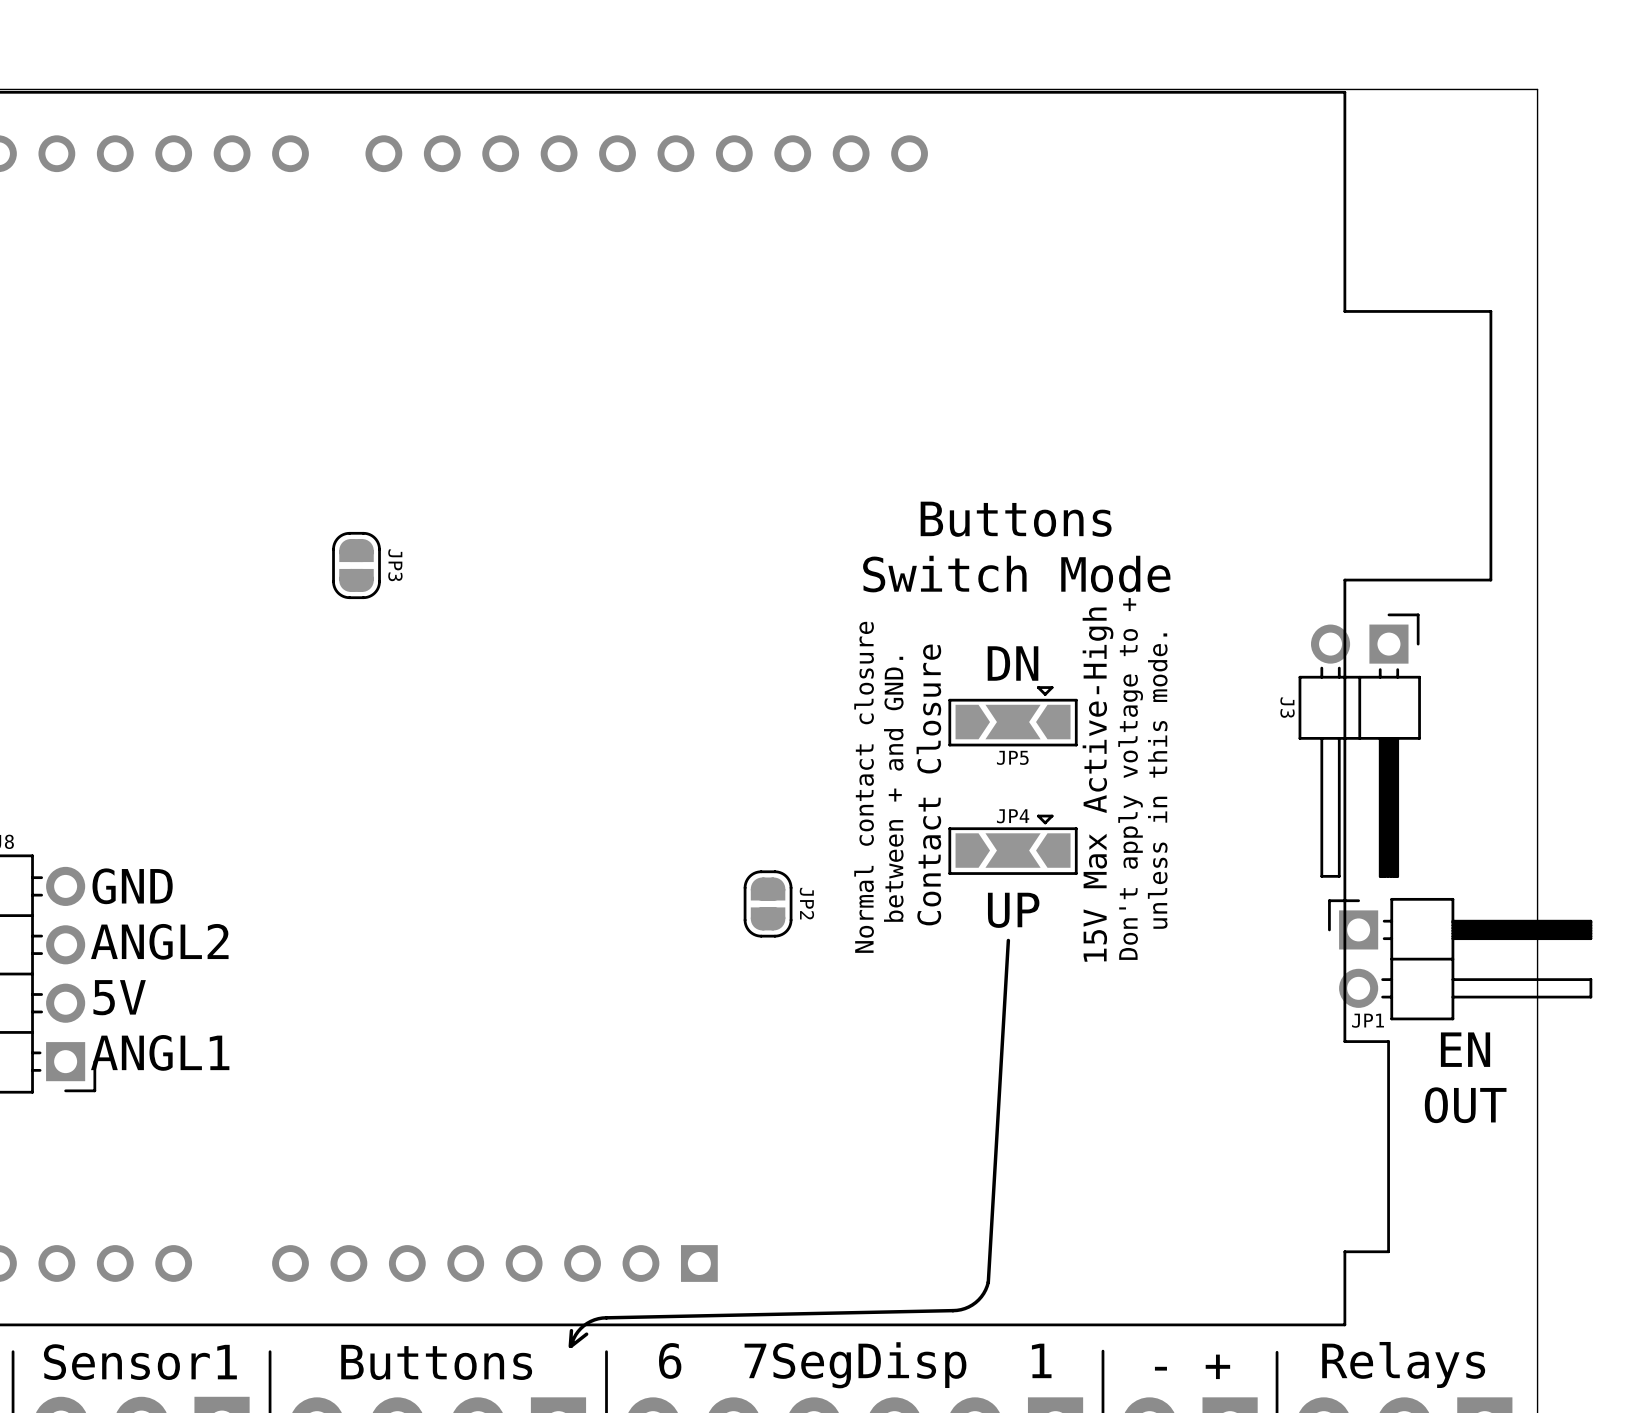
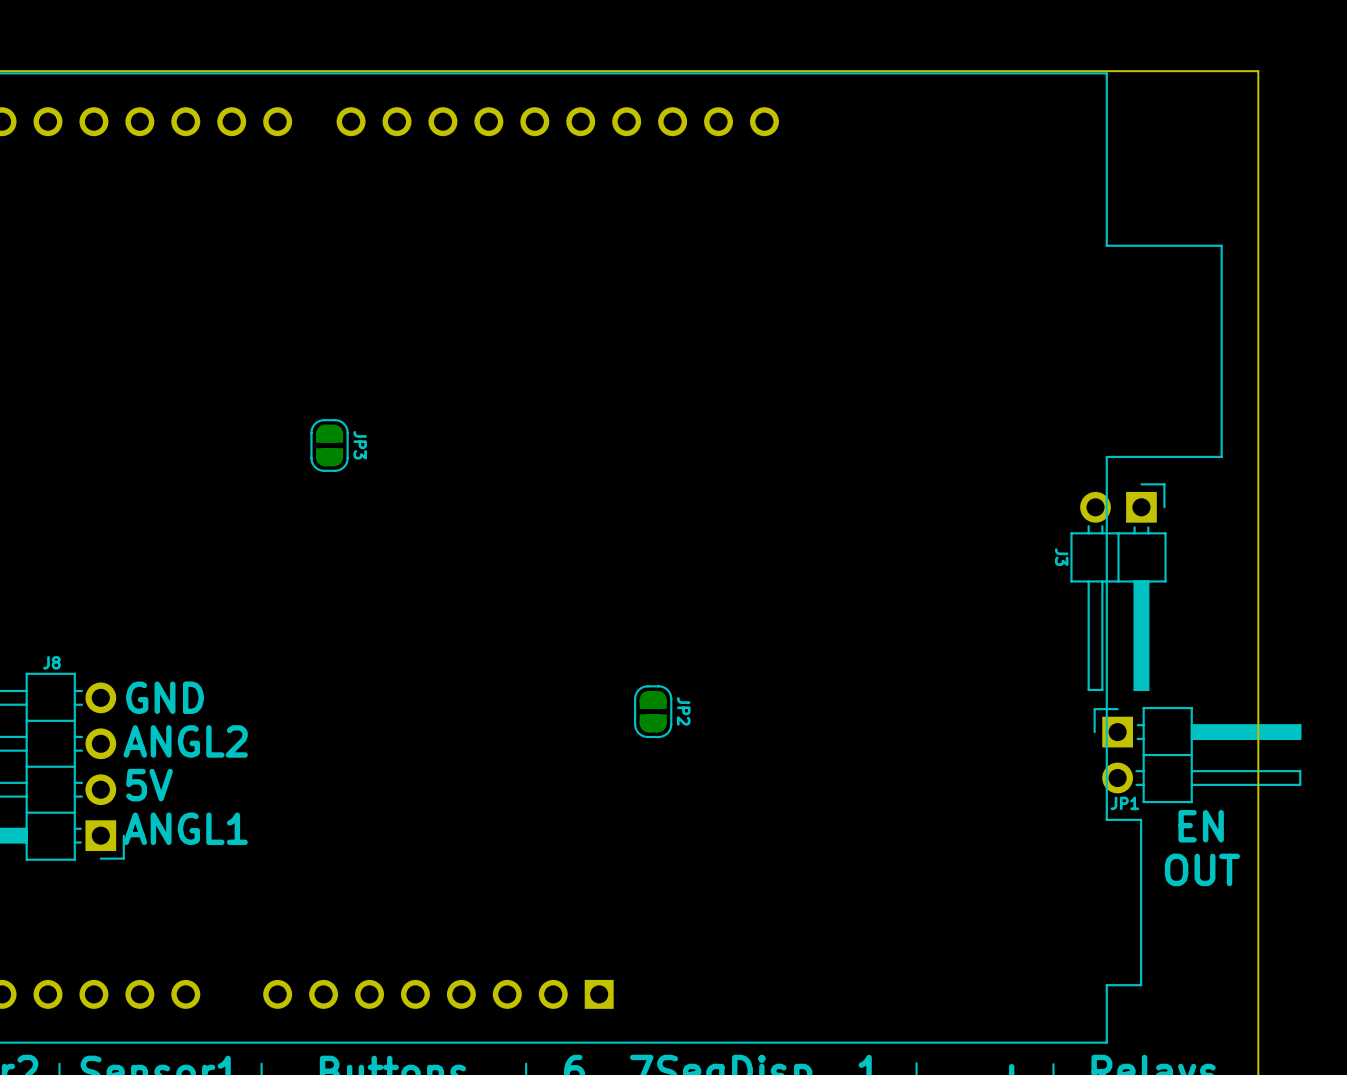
text: Buttons (1016, 519) -> none
text: Switch Mode (1016, 574) -> none
text: DN (1013, 663) -> none
JP5: (1013, 716) -> none
text: Don't apply voltage to + (1130, 778) -> none
text: unless in this mode. (1157, 781) -> none
text: Contact Closure (928, 784) -> none
text: 15V Max Active-High (1098, 784) -> none
text: Normal contact closure (864, 787) -> none
text: between + and GND. (893, 789) -> none
JP4: (1013, 844) -> none
text: UP (1013, 910) -> none
line: (1008, 940) (988, 1282) (978, 1299) (968, 1307) (952, 1310) (602, 1318) (583, 1325) (575, 1334) (571, 1346) (586, 1334) -> none
line: (571, 1330) (570, 1346) -> none

